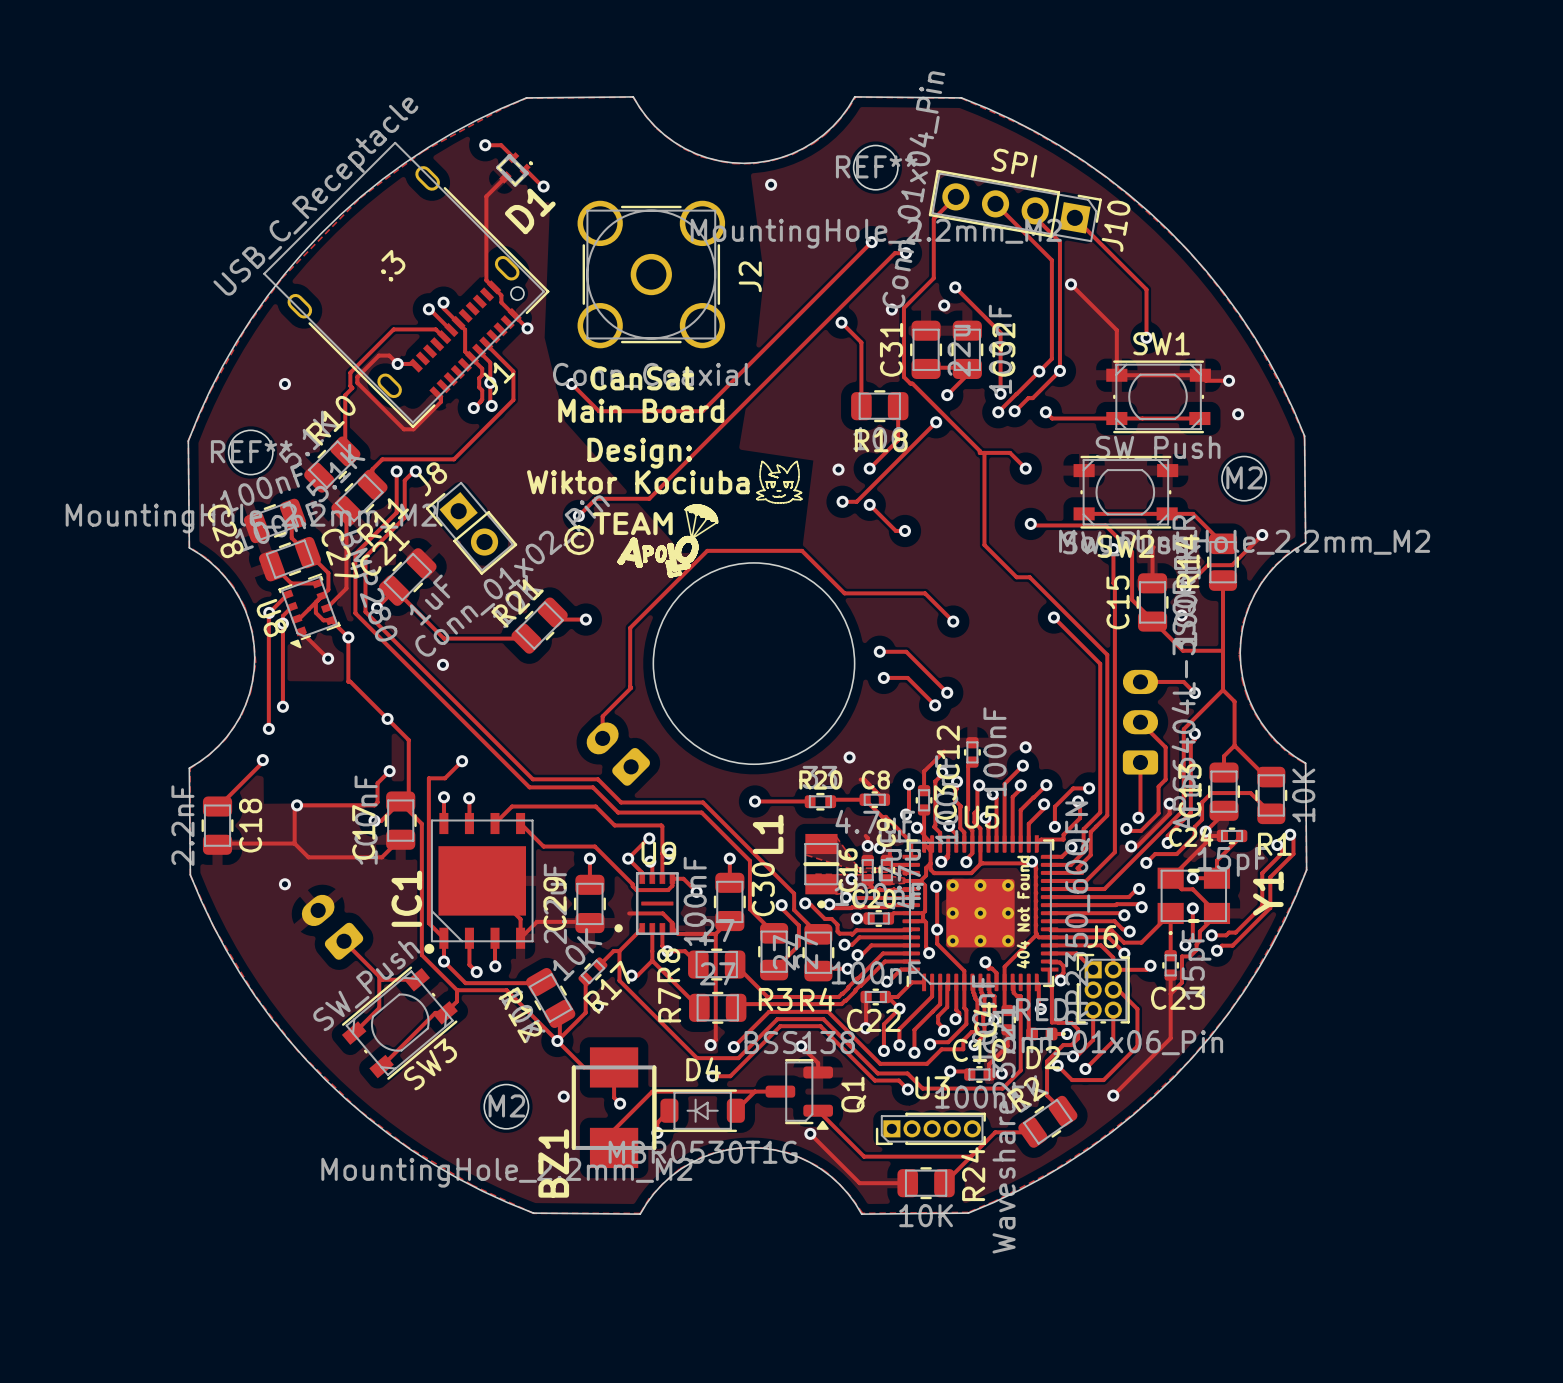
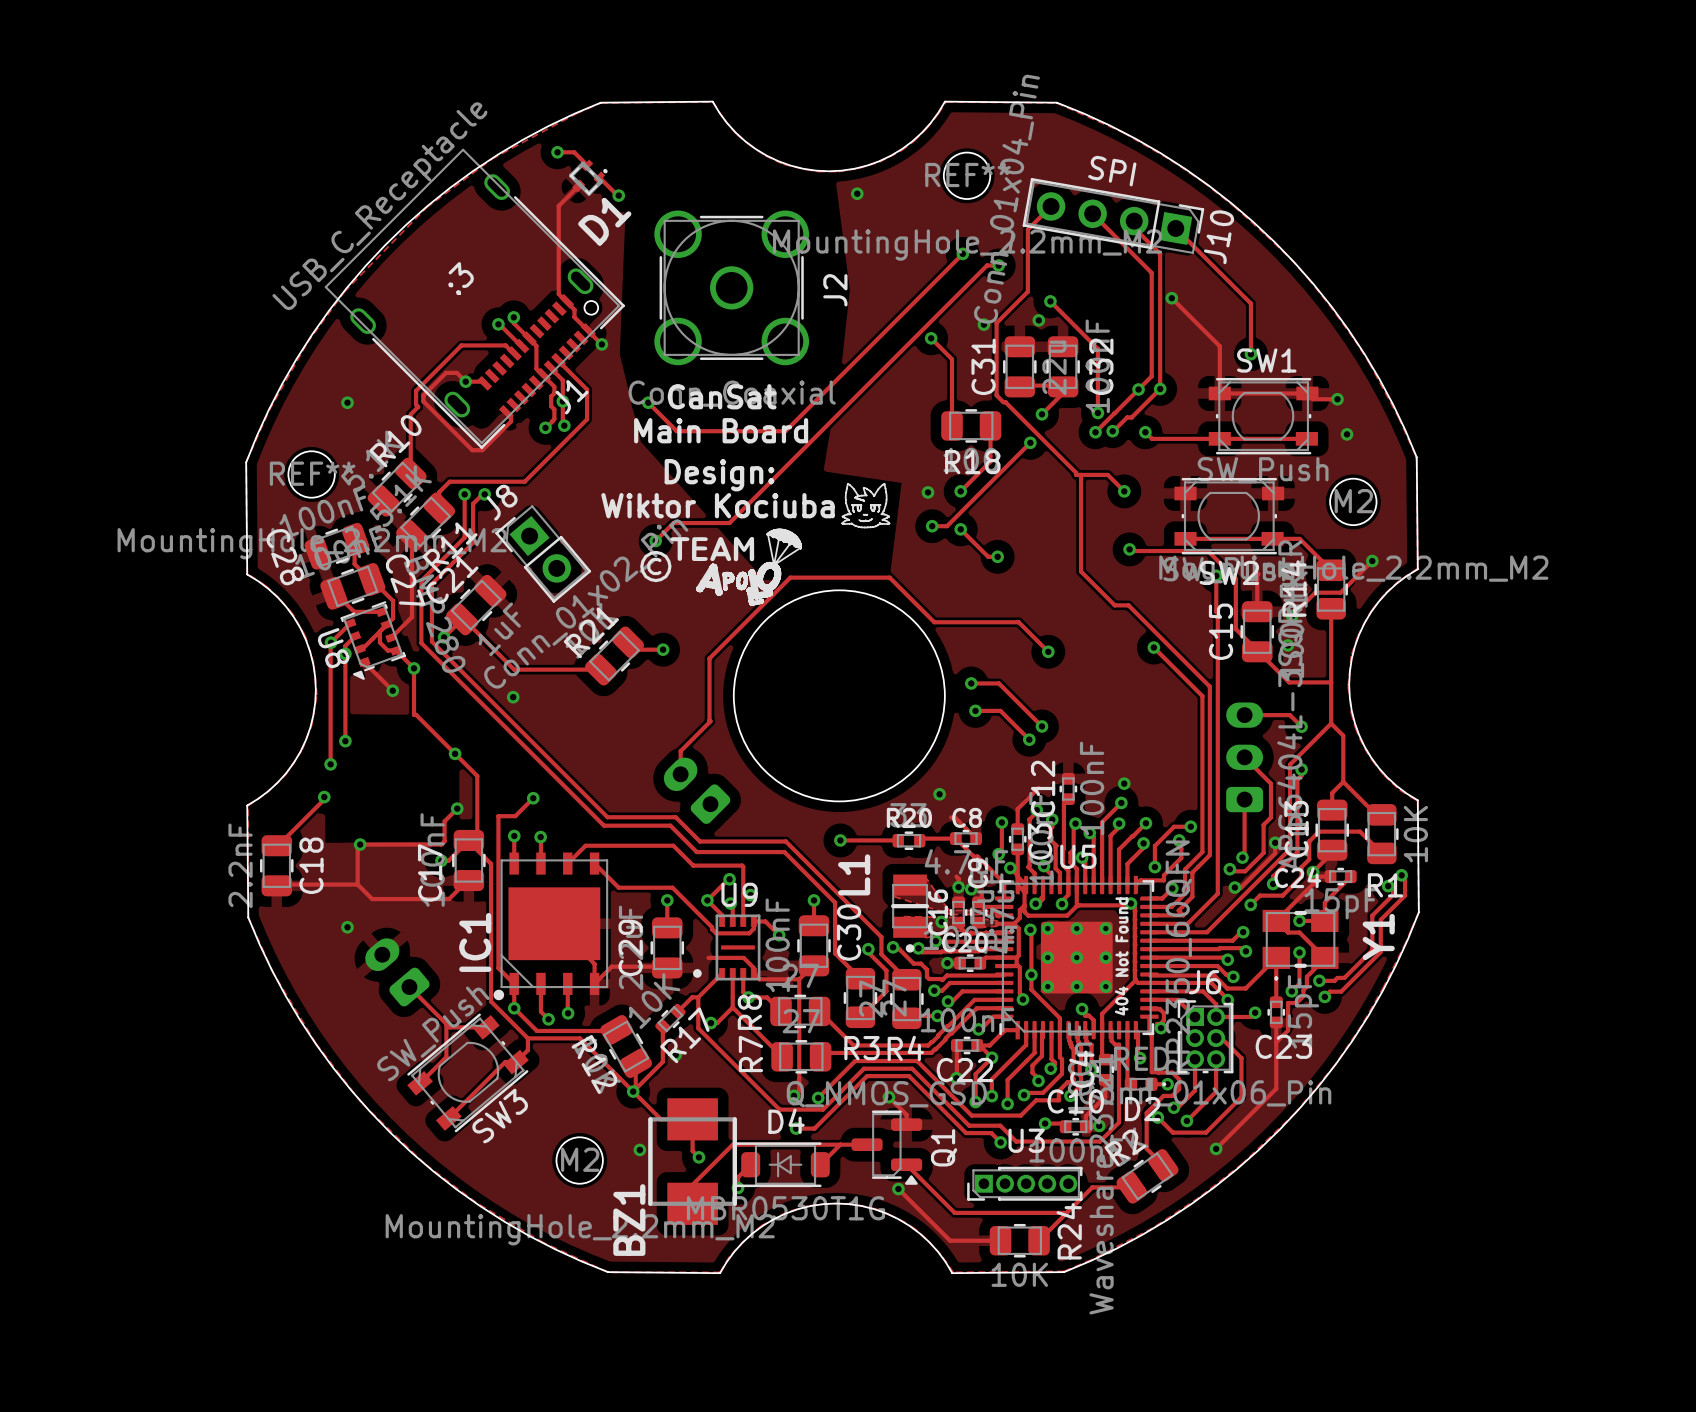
Q1 value: BSS138 (799, 1042) -> Q_NMOS_GSD (886, 1094)

